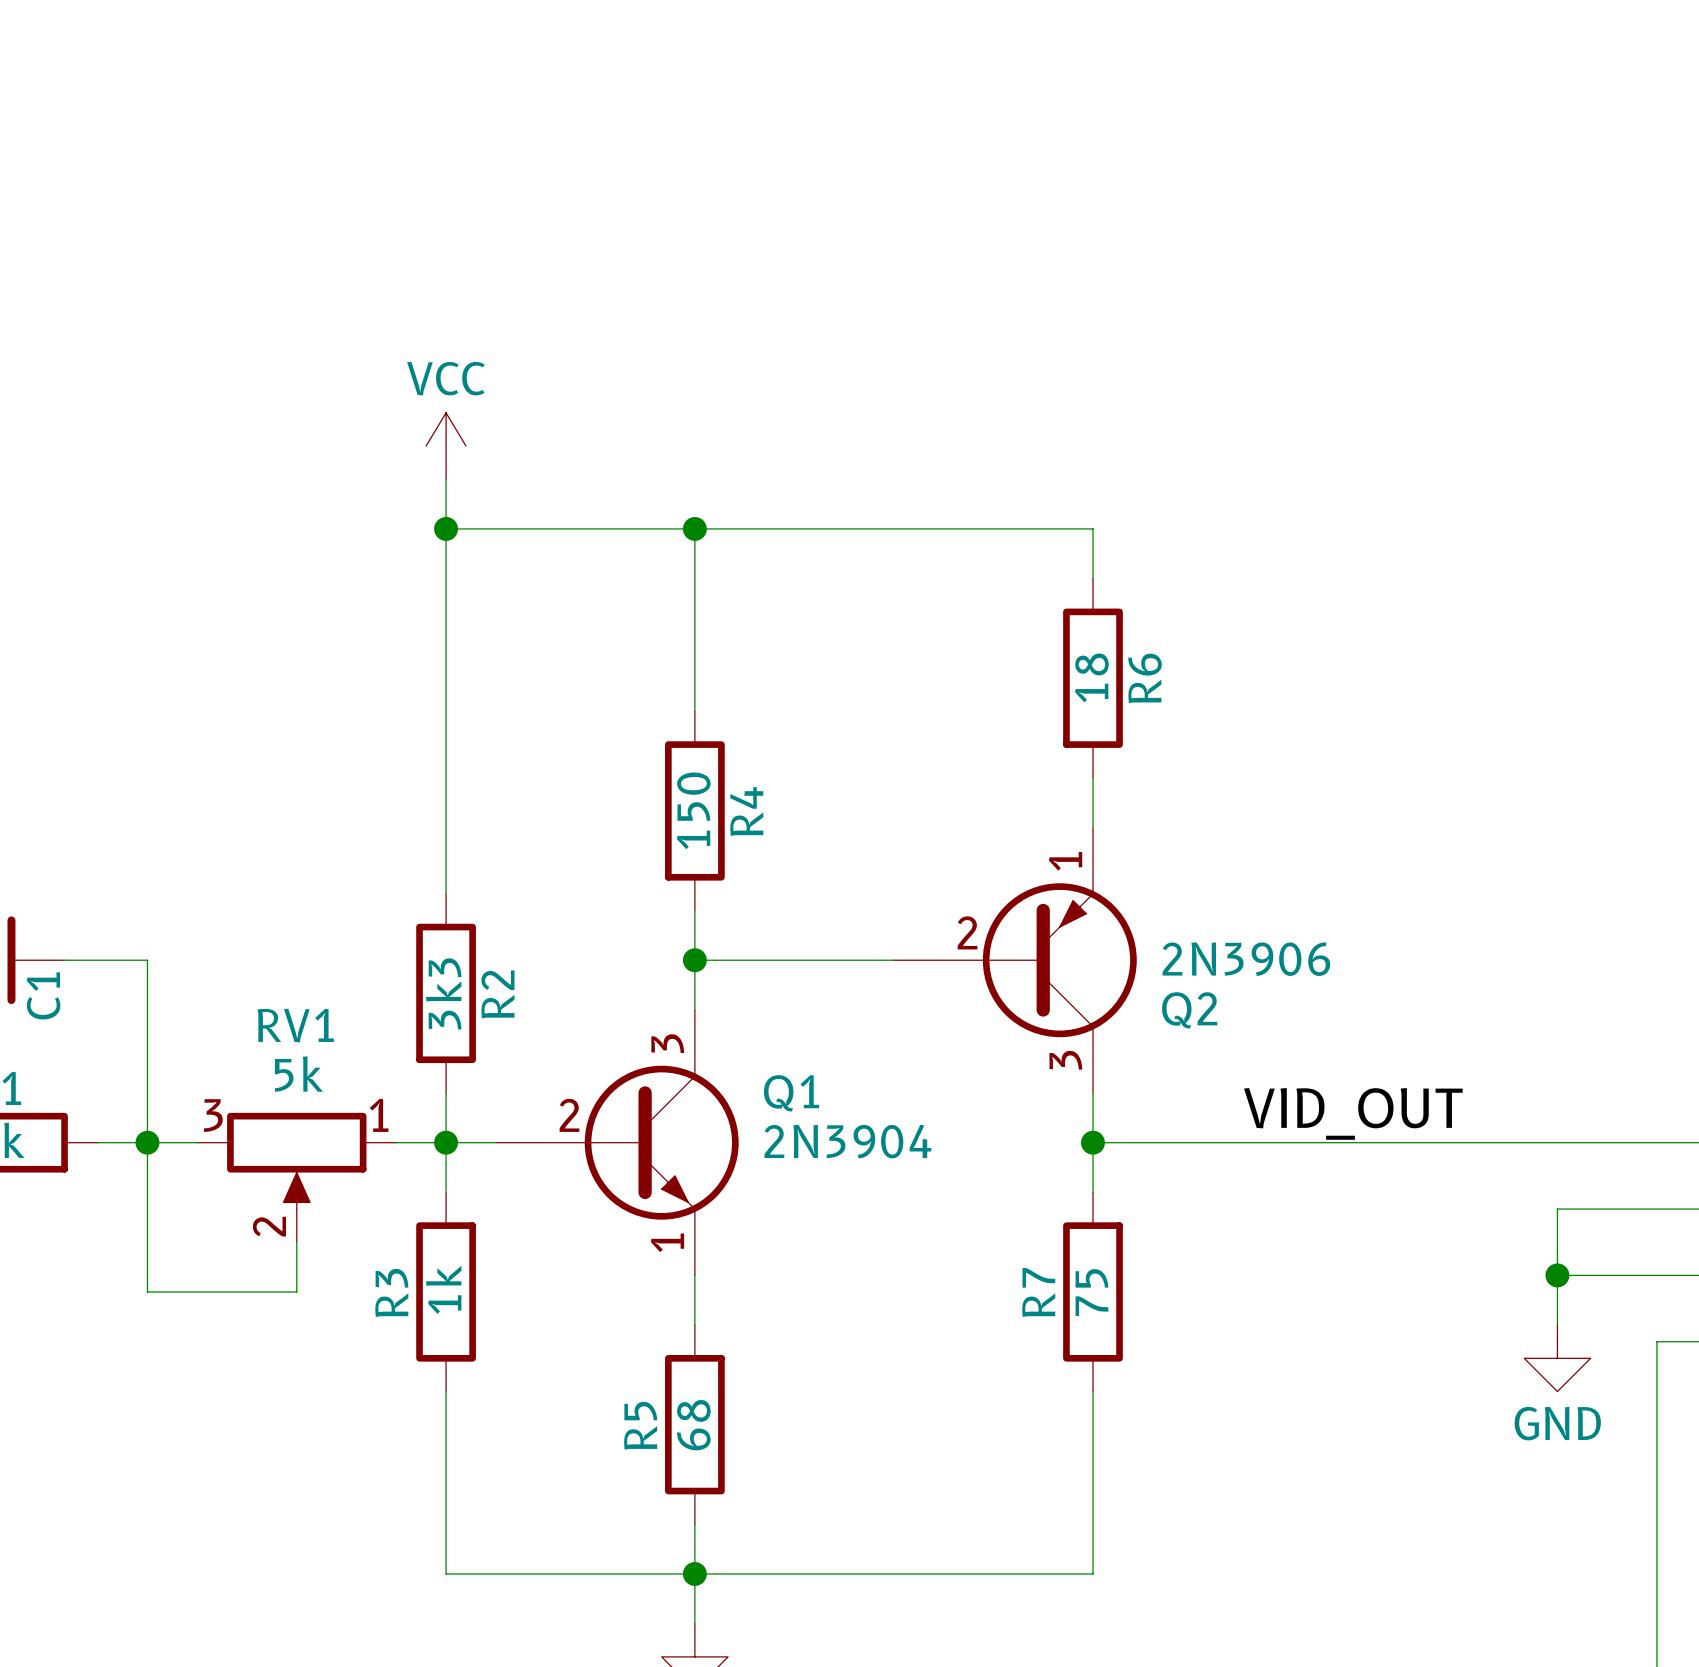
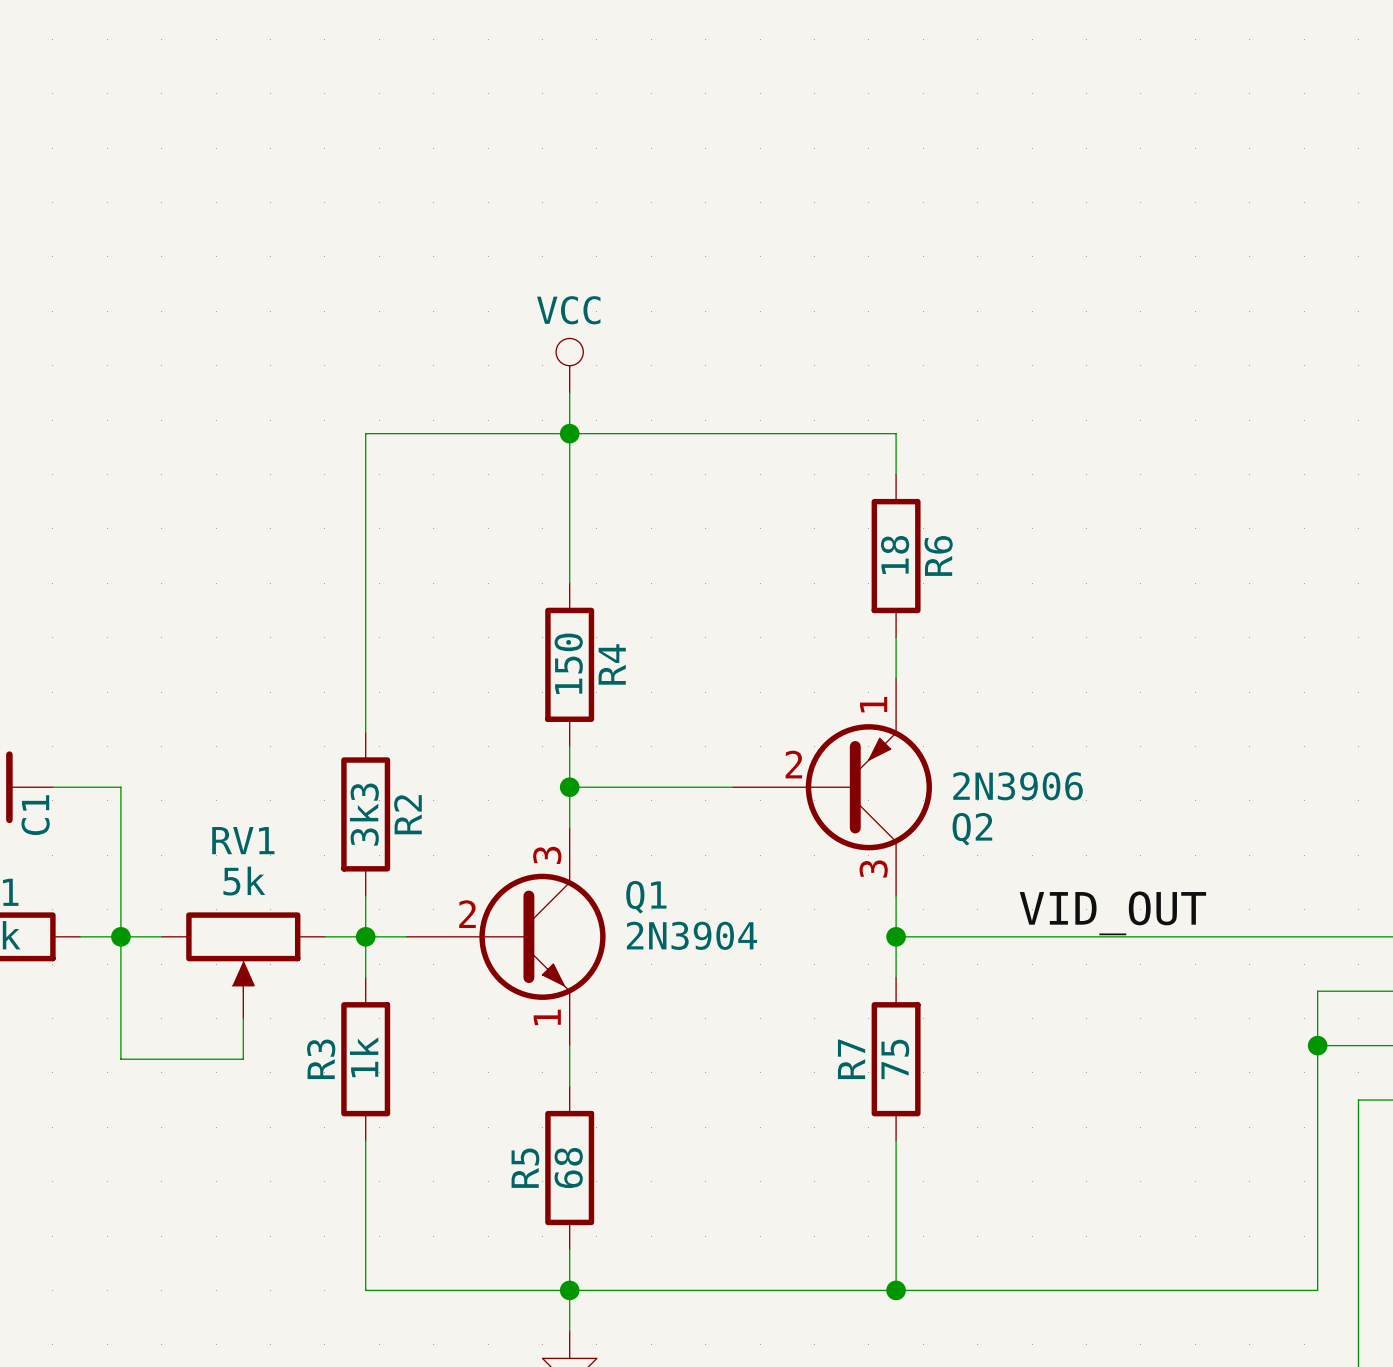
power symbol: VCC (446, 446) -> none
power symbol: none -> VCC (569, 365)
wire: (446, 479) (446, 528) -> (569, 392) (569, 433)
junction: (446, 528) -> none
RV1 symbol: [197, 1112, 397, 1243] -> [161, 912, 325, 1019]
wire: (1607, 1209) (1557, 1209) (1557, 1325) -> (1317, 991) (1317, 1290) (896, 1290)
wire: (1557, 1275) (1607, 1275) -> none
junction position: (1557, 1275) -> (1317, 1045)
power symbol: GND (1557, 1358) -> none
junction: none -> (896, 1290)

